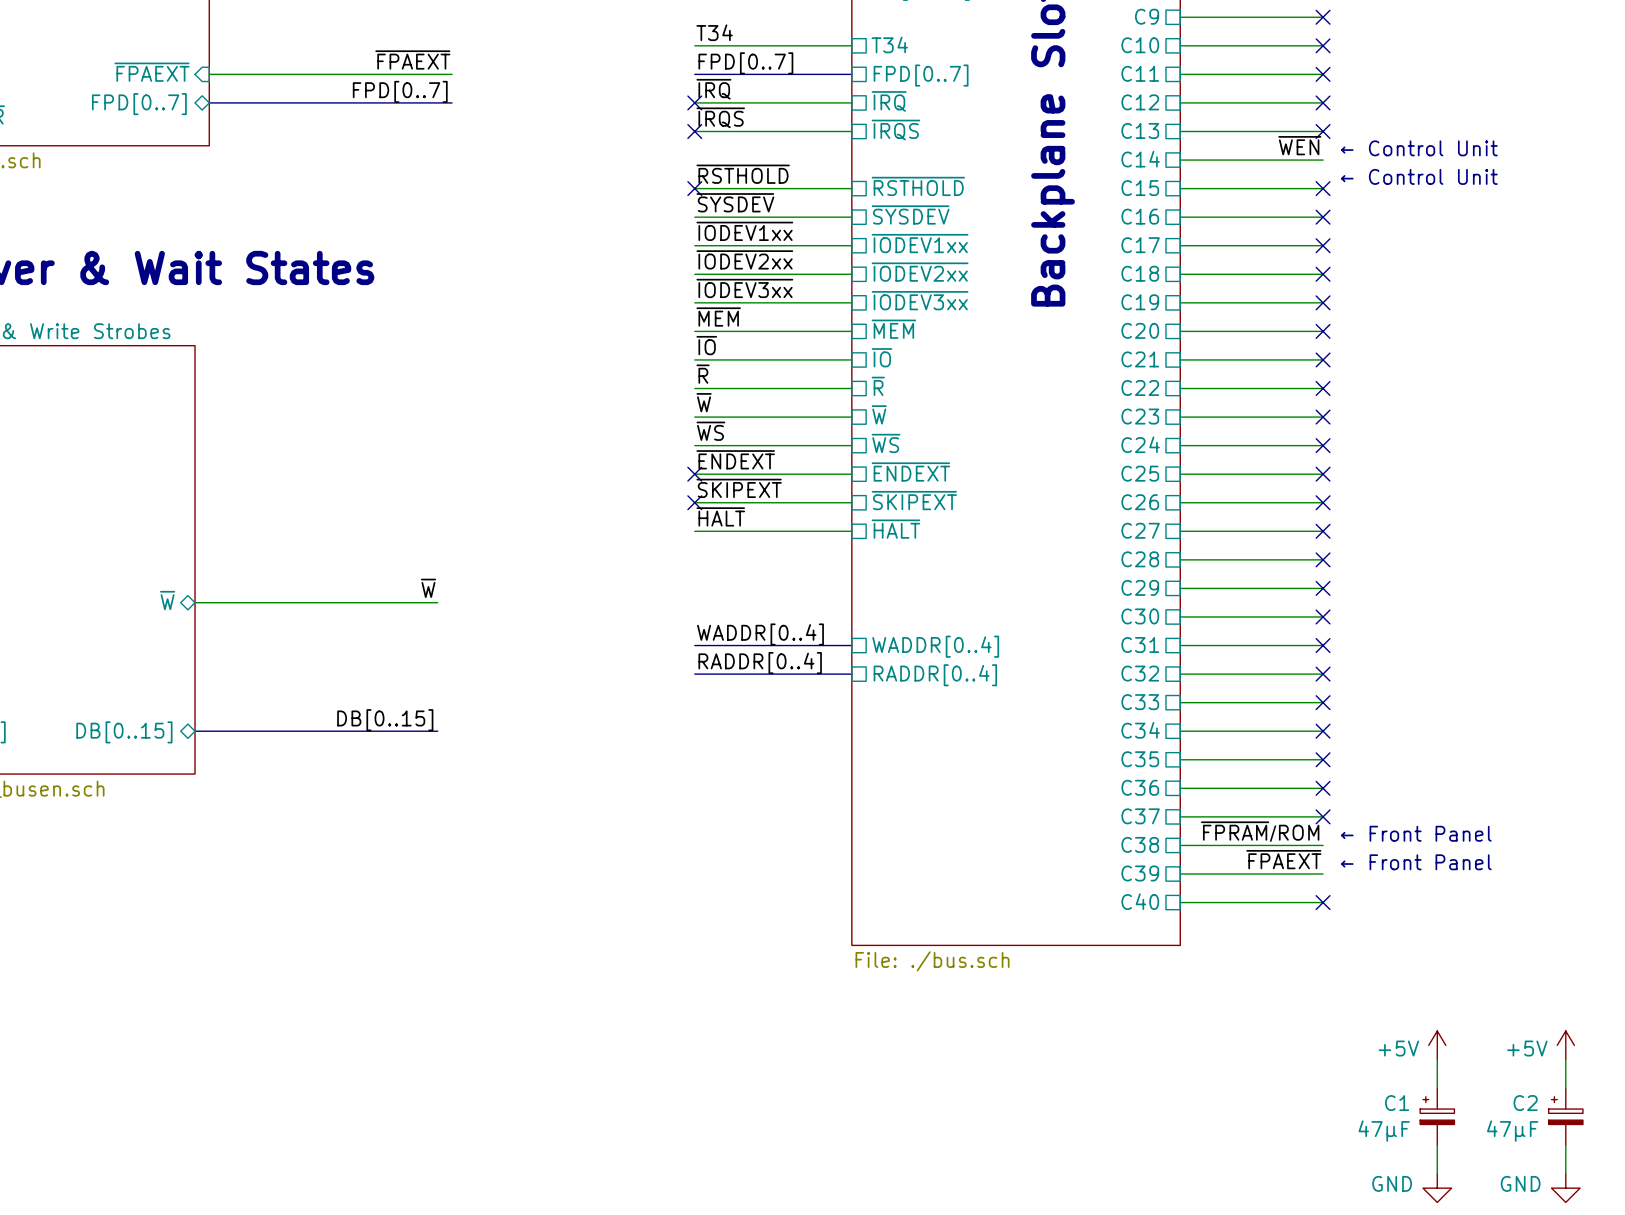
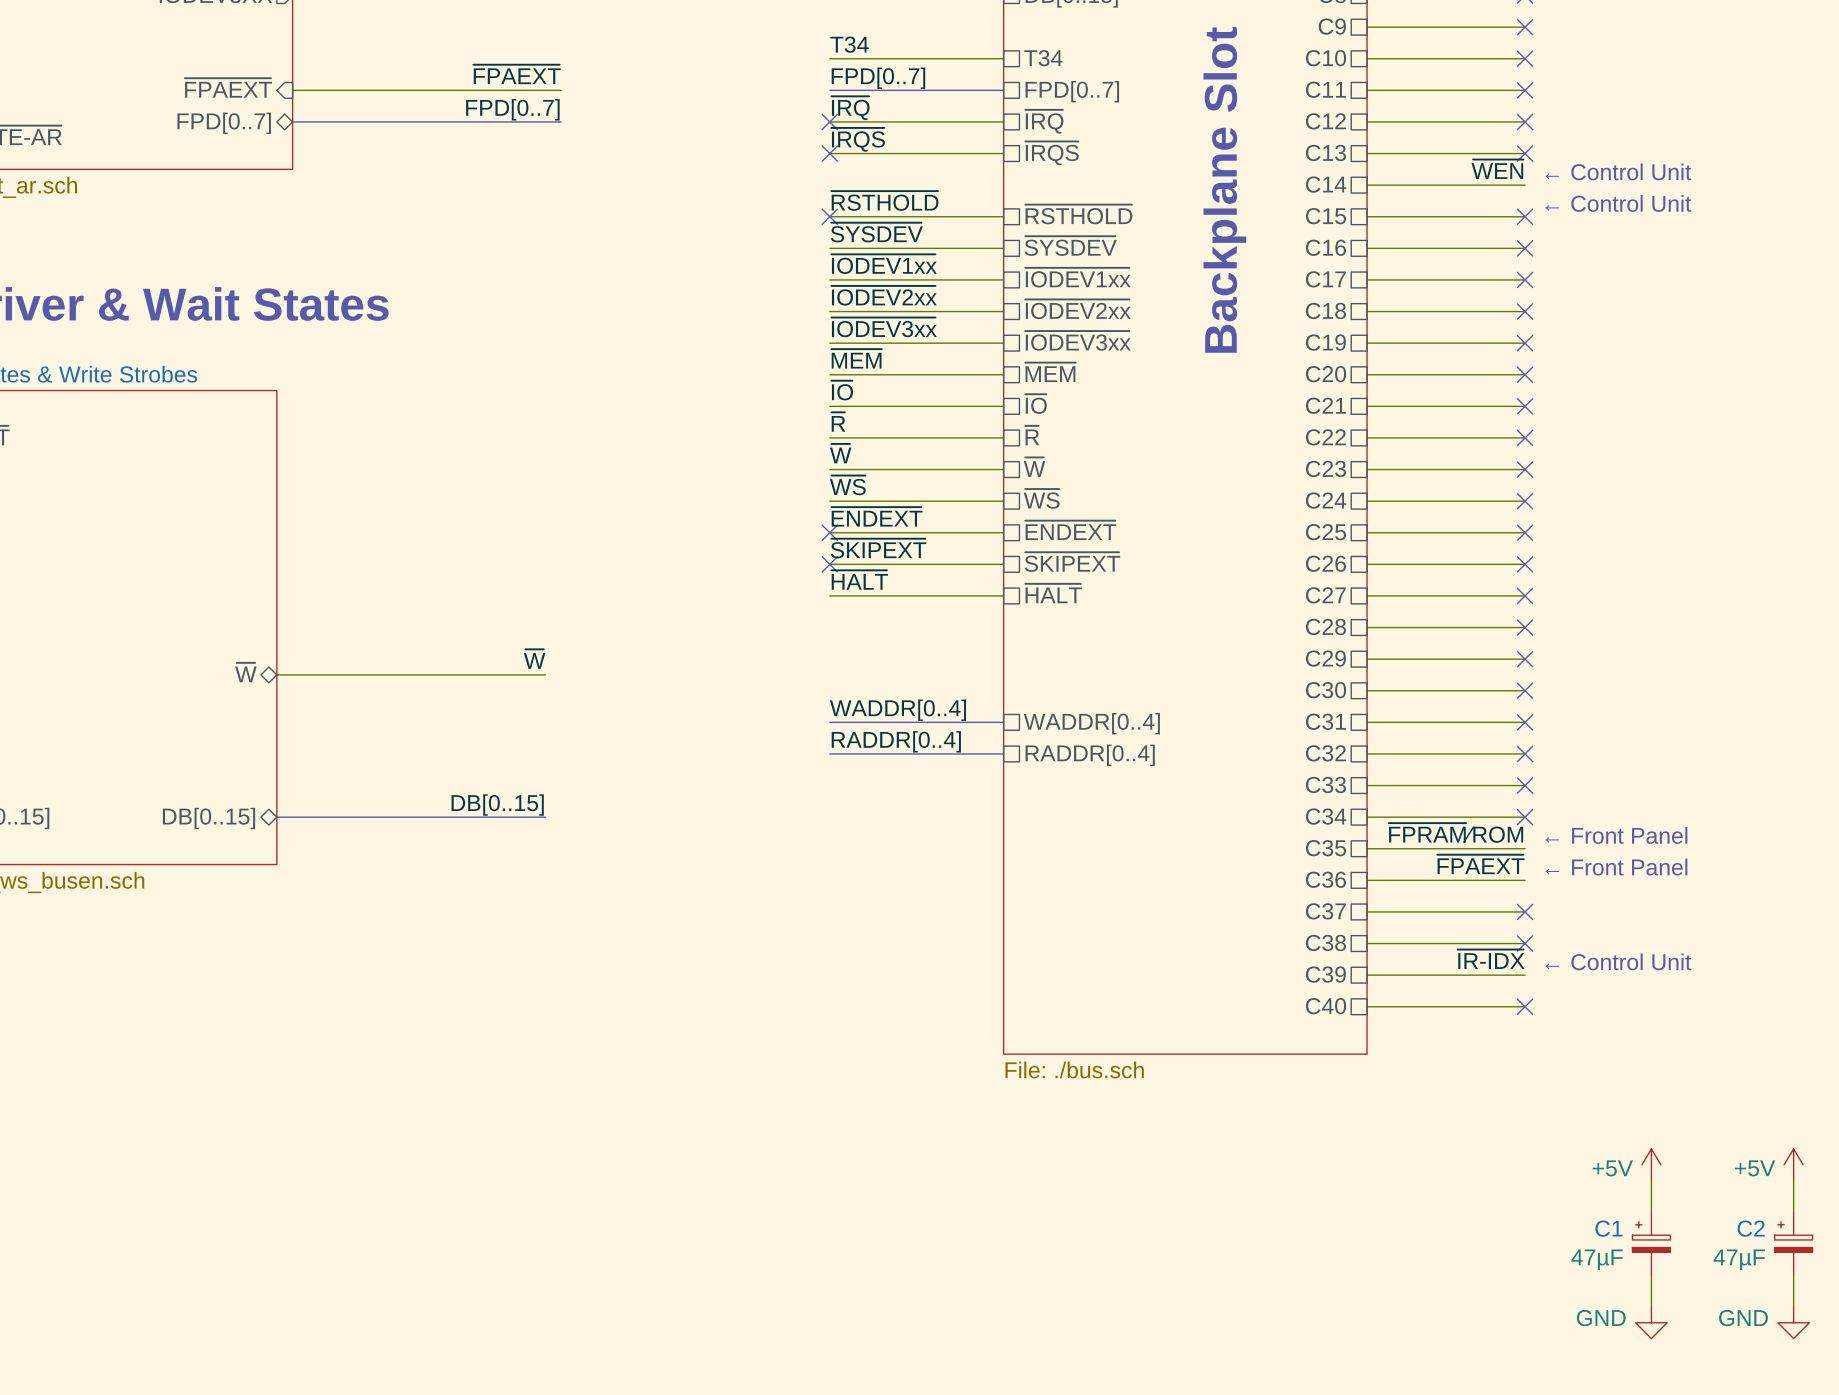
text: none -> ← Front Panel (1616, 835)
no-connect mark: (1323, 759) -> none
label: none -> ~{FPAEXT} (1480, 864)
text: none -> ← Front Panel (1616, 867)
no-connect mark: (1323, 788) -> none
label position: ~{FPRAM}∕ROM (1260, 831) -> ~{FPRAM}∕ROM (1455, 832)
text: ← Front Panel (1416, 833) -> none
no-connect mark: none -> (1525, 943)
label: ~{FPAEXT} (1283, 859) -> ~{IR-IDX} (1491, 959)
text: ← Front Panel (1416, 862) -> ← Control Unit (1618, 961)

